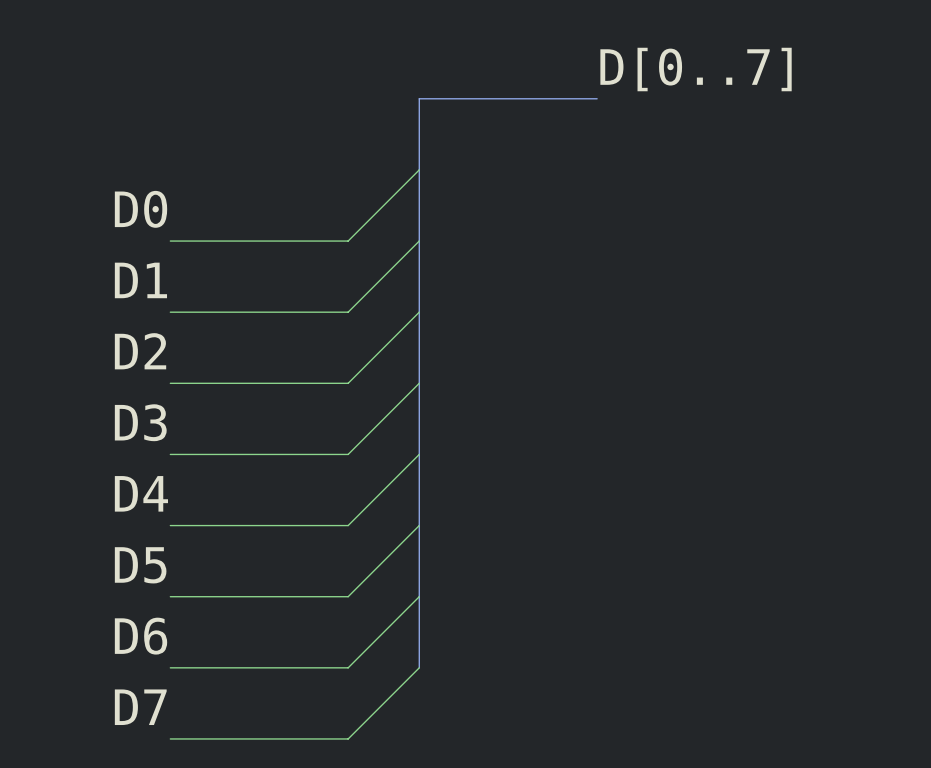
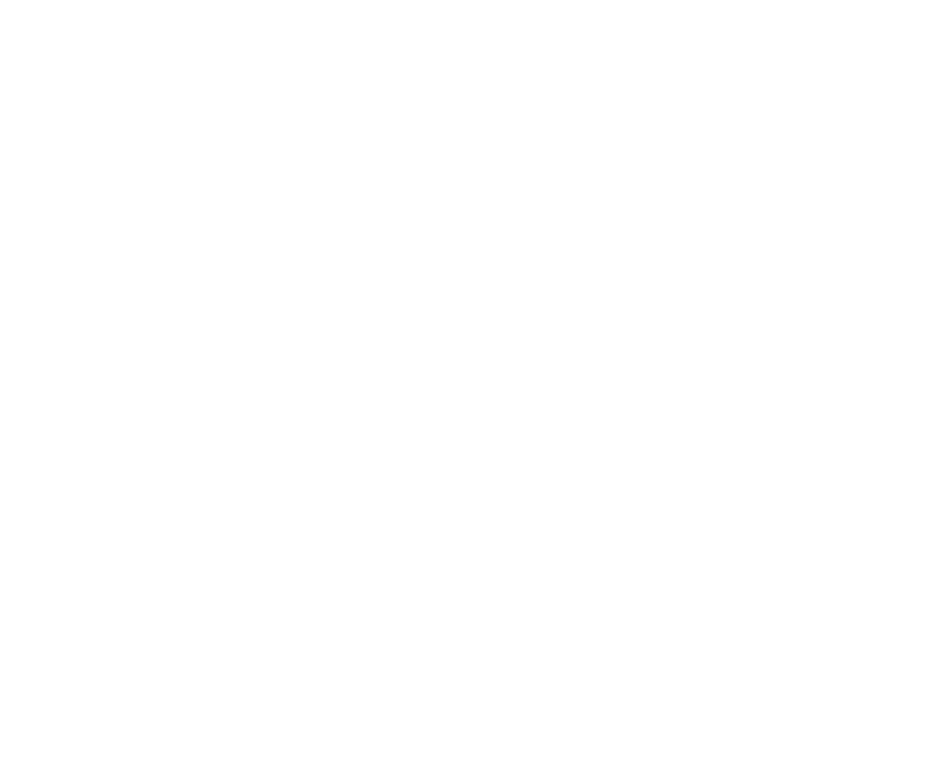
label: D[0..7] (696, 69) -> none
bus: (597, 98) (419, 98) (419, 667) -> none
wire: (419, 169) (348, 241) (170, 241) -> none
label: D0 (141, 209) -> none
wire: (419, 241) (348, 312) (170, 312) -> none
label: D1 (140, 280) -> none
wire: (419, 312) (348, 383) (170, 383) -> none
label: D2 (140, 351) -> none
wire: (419, 383) (348, 454) (170, 454) -> none
label: D3 (140, 422) -> none
wire: (419, 454) (348, 525) (170, 525) -> none
label: D4 (141, 493) -> none
wire: (419, 525) (348, 596) (170, 596) -> none
label: D5 (140, 565) -> none
wire: (419, 596) (348, 667) (170, 667) -> none
label: D6 (141, 636) -> none
wire: (419, 667) (348, 738) (170, 738) -> none
label: D7 (140, 707) -> none

